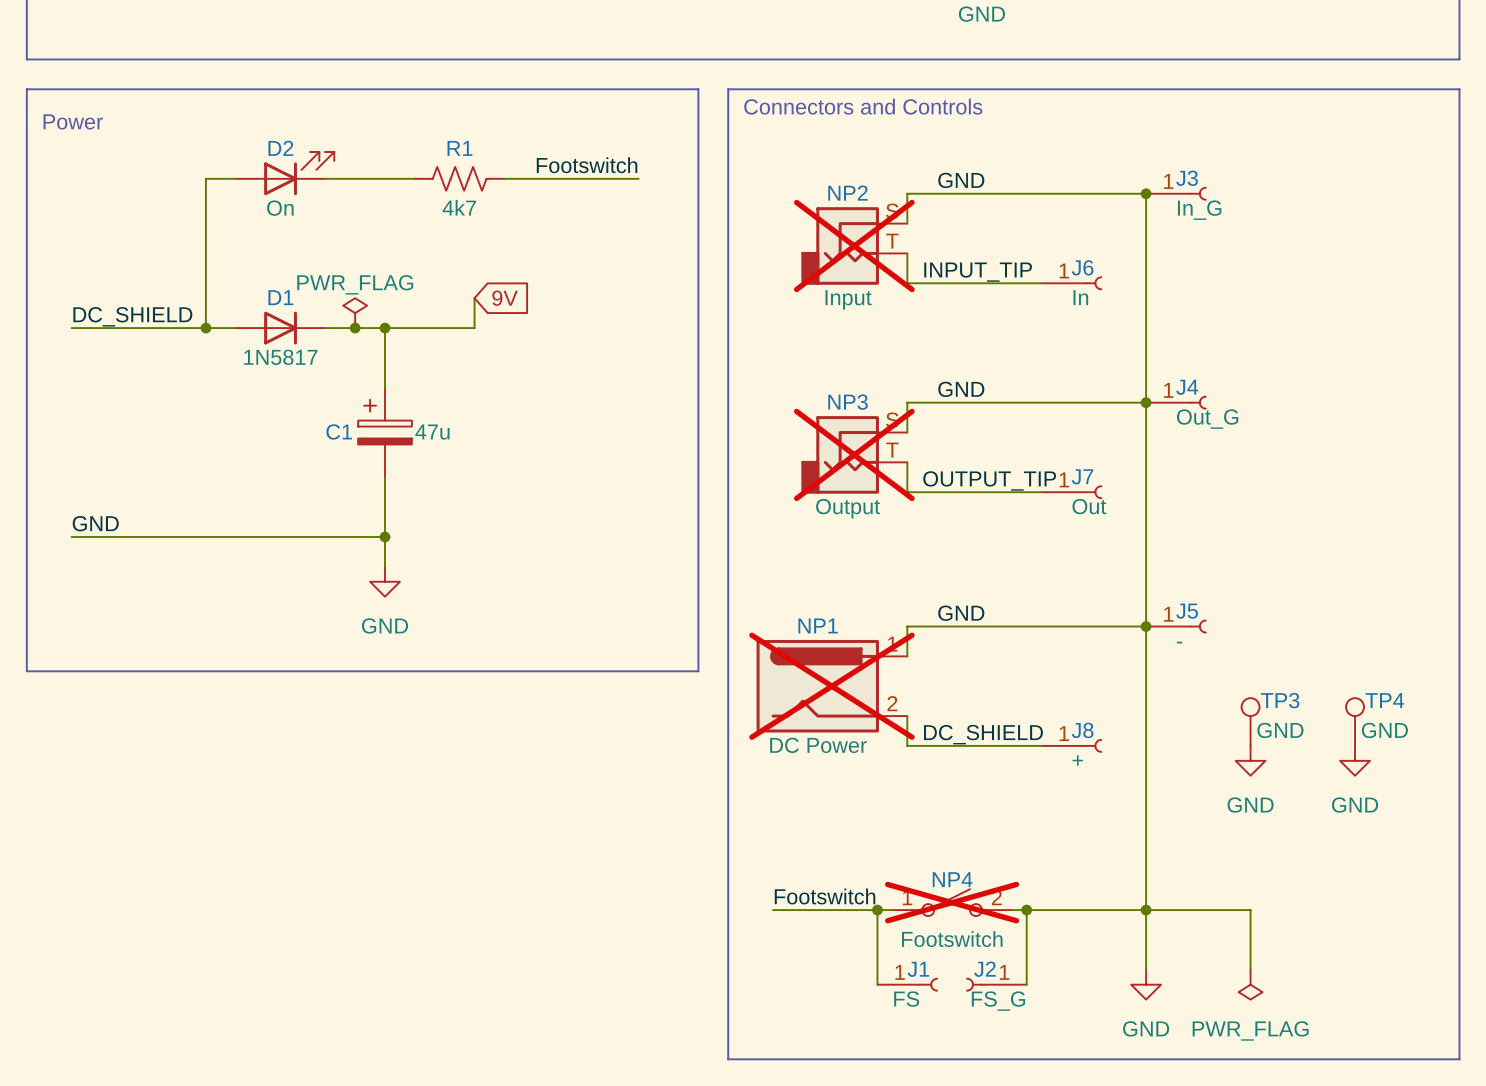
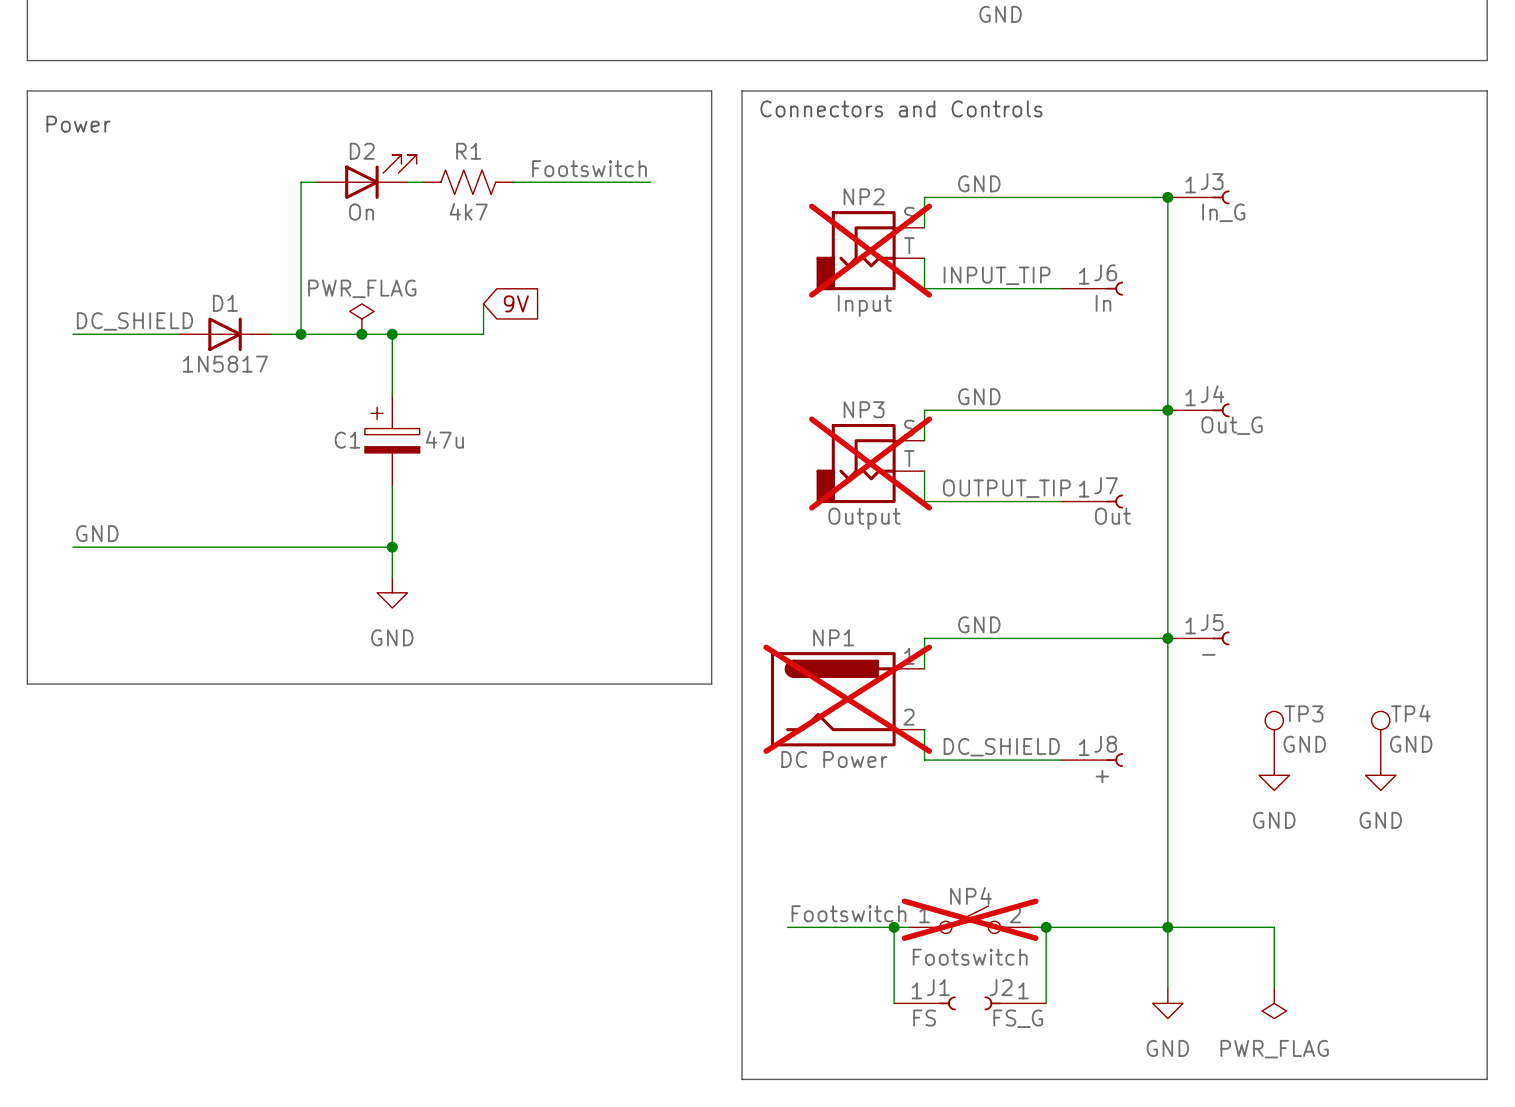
D2 position: (285, 173) -> (366, 176)
wire: (235, 178) (205, 178) (205, 328) -> none
wire: none -> (316, 182) (301, 182) (301, 334)
junction: (205, 328) -> none
D1 position: (280, 328) -> (225, 334)
junction: none -> (301, 334)

